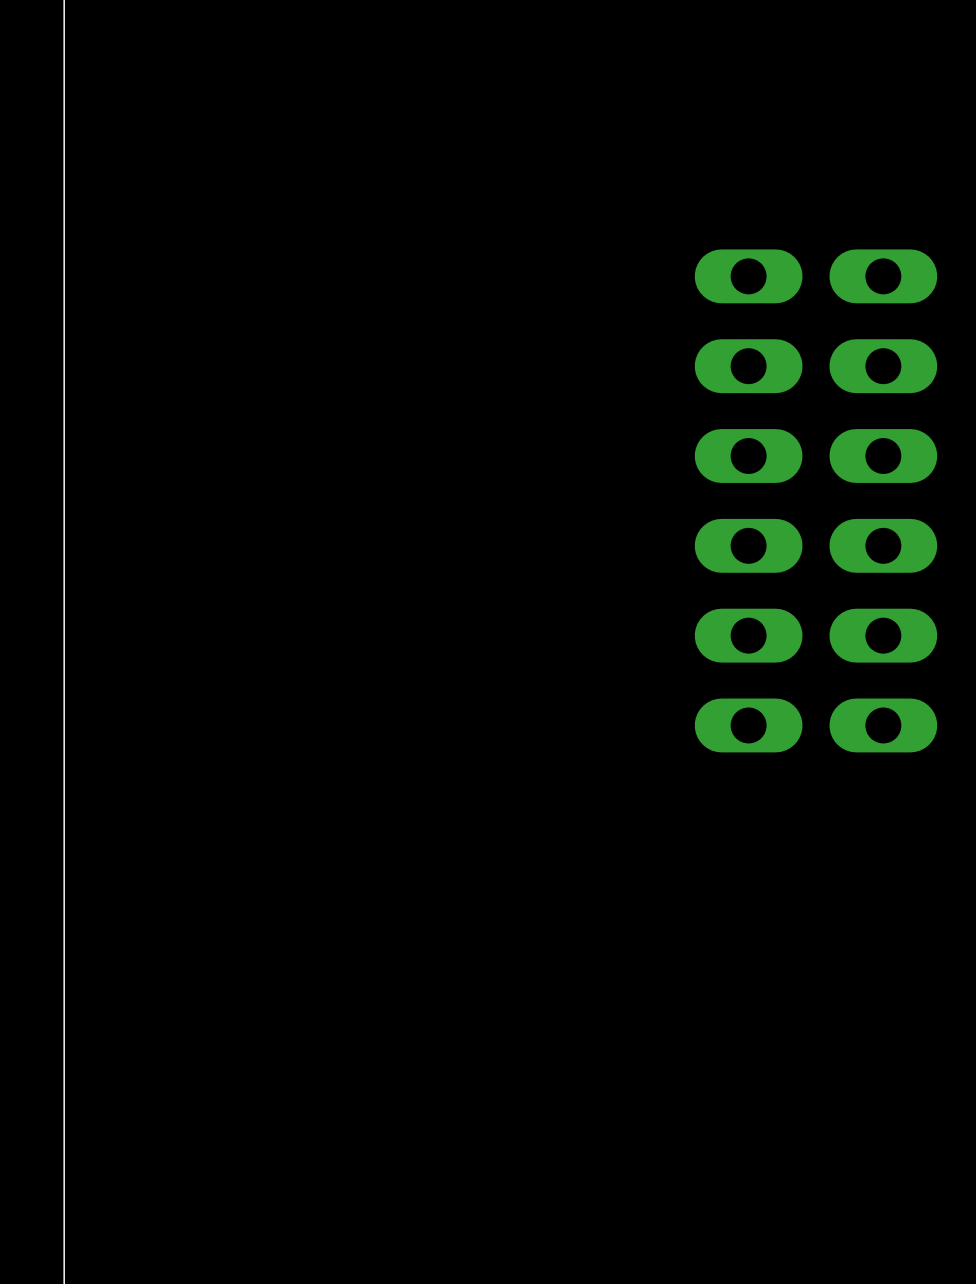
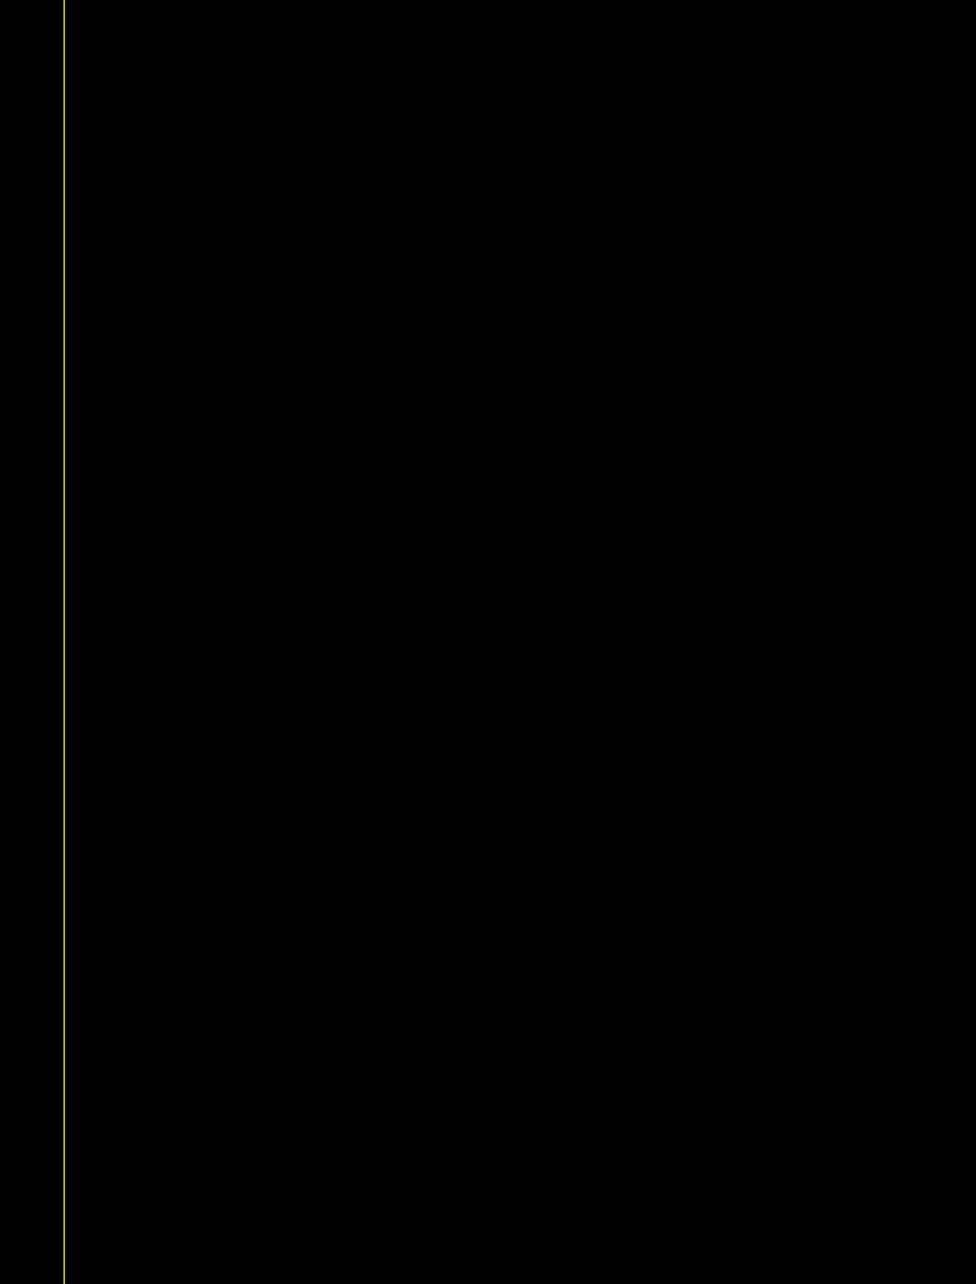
part: (748, 500) -> none
part: (883, 500) -> none

